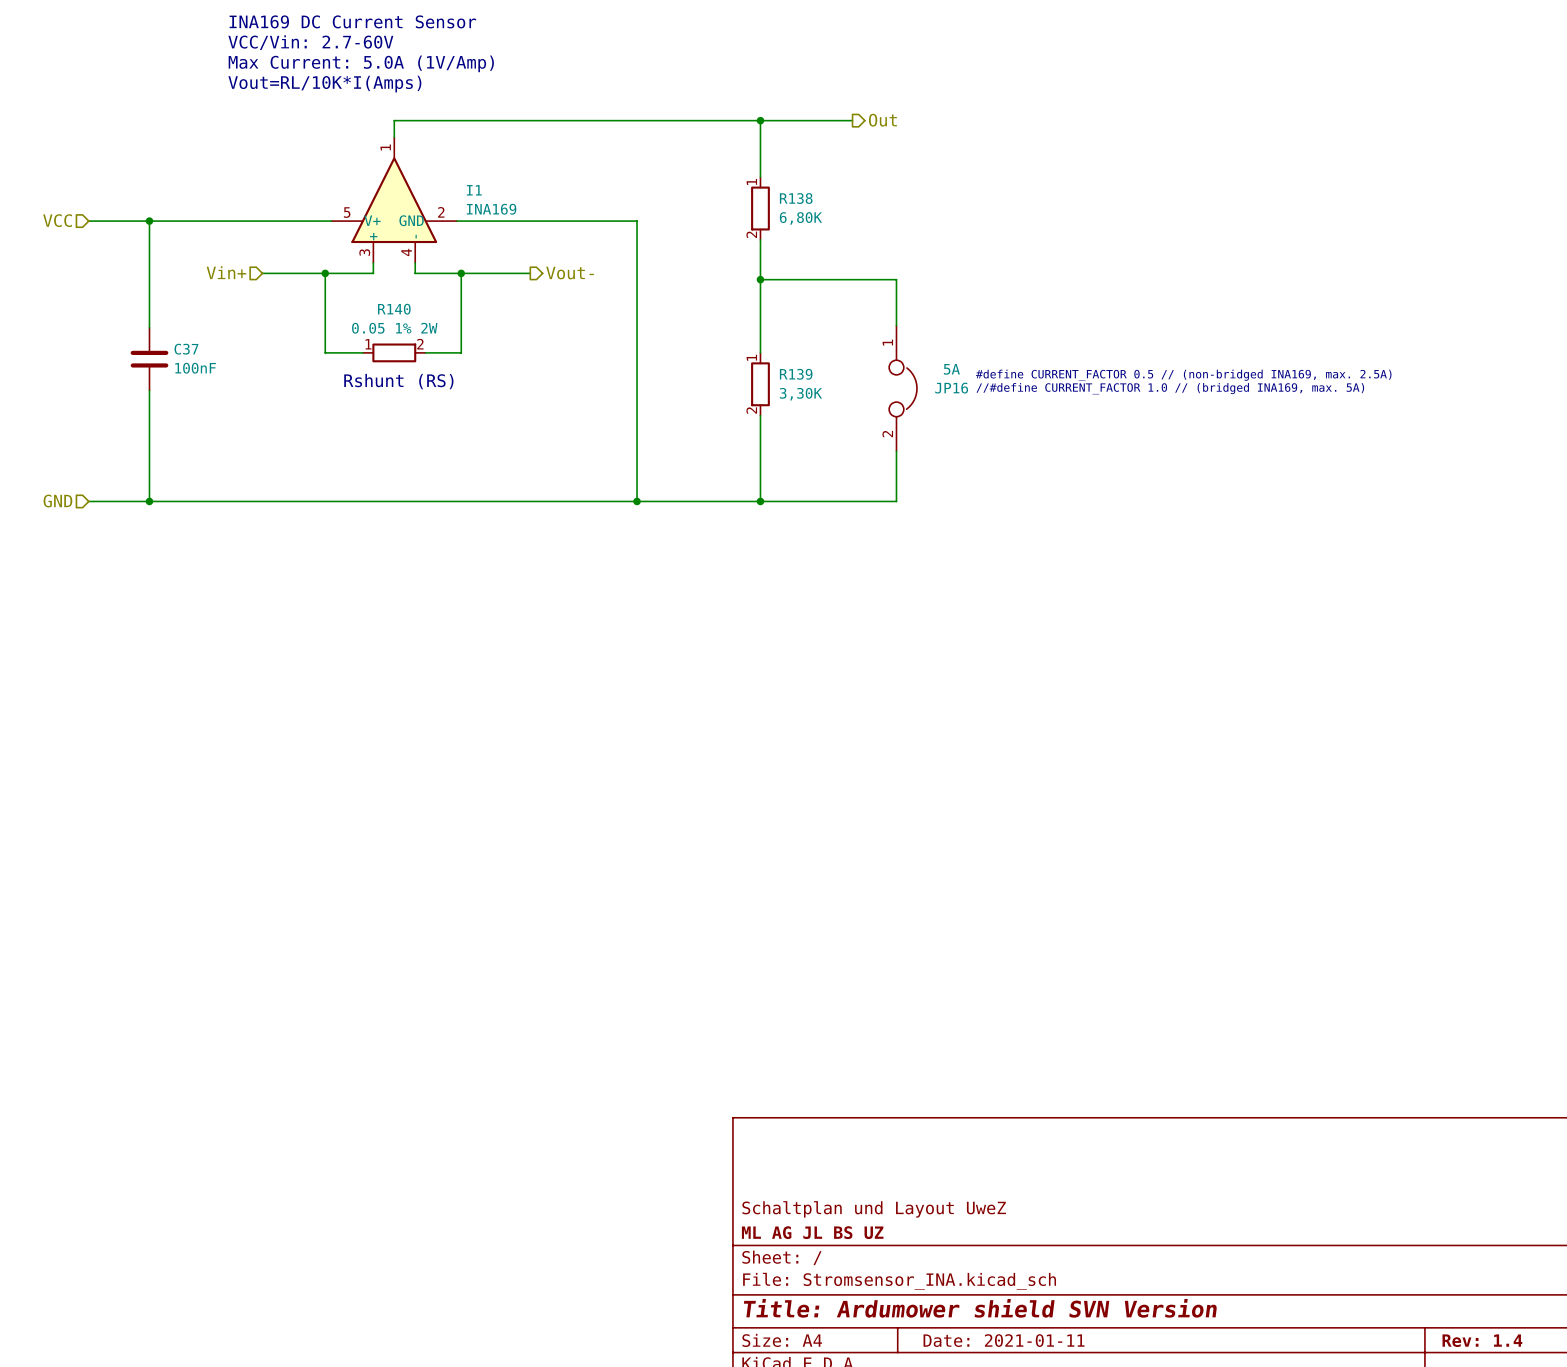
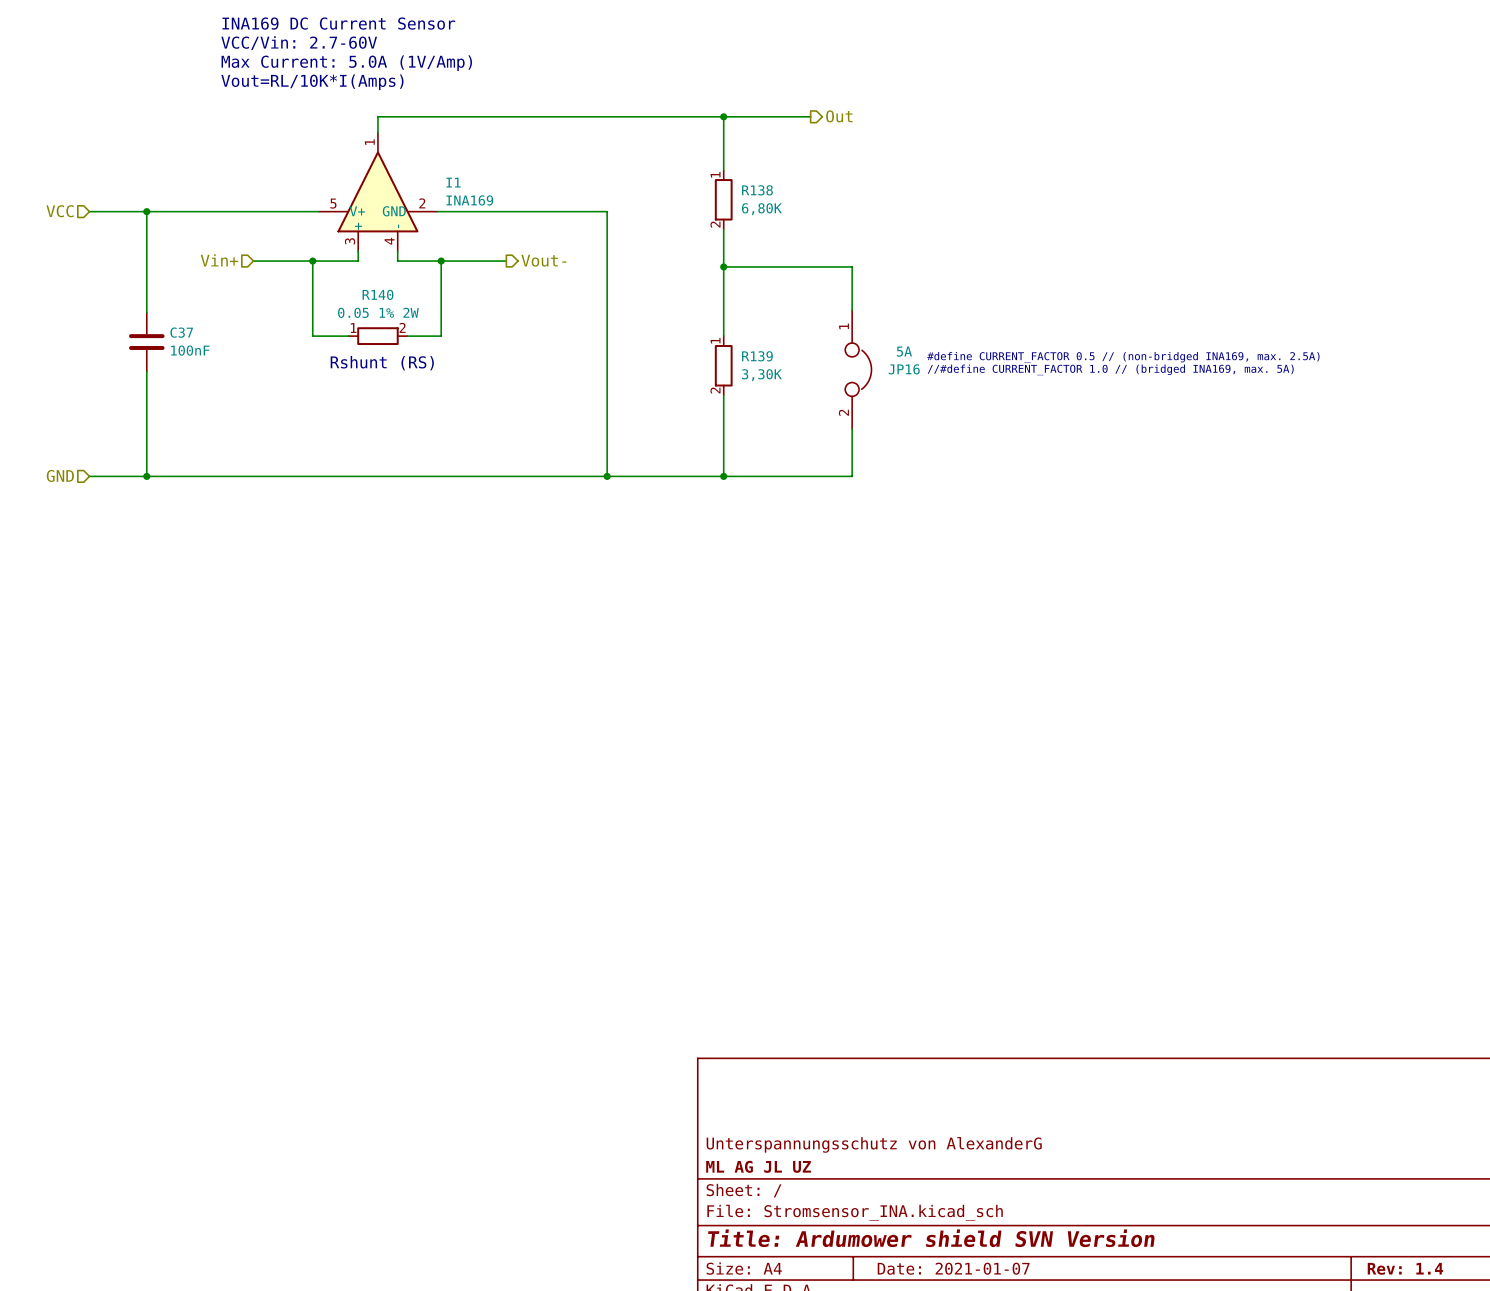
title block: Schaltplan und Layout UweZ (874, 1209) -> Unterspannungsschutz von AlexanderG (874, 1144)
title block: ML AG JL BS UZ (812, 1232) -> ML AG JL UZ (758, 1166)
title block: Date: 2021-01-11 (1004, 1340) -> Date: 2021-01-07 (953, 1268)

